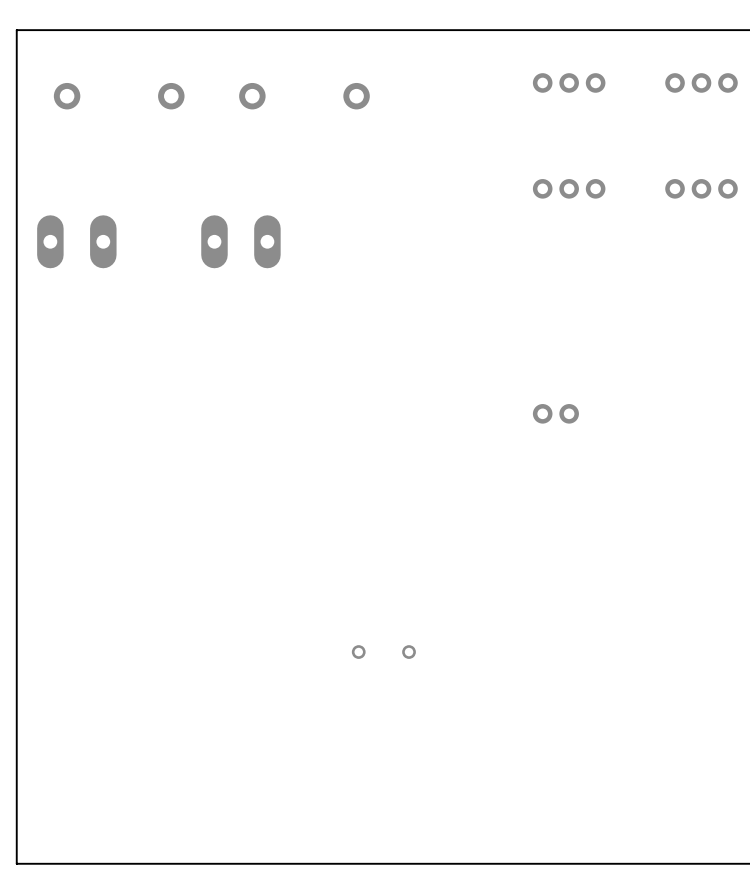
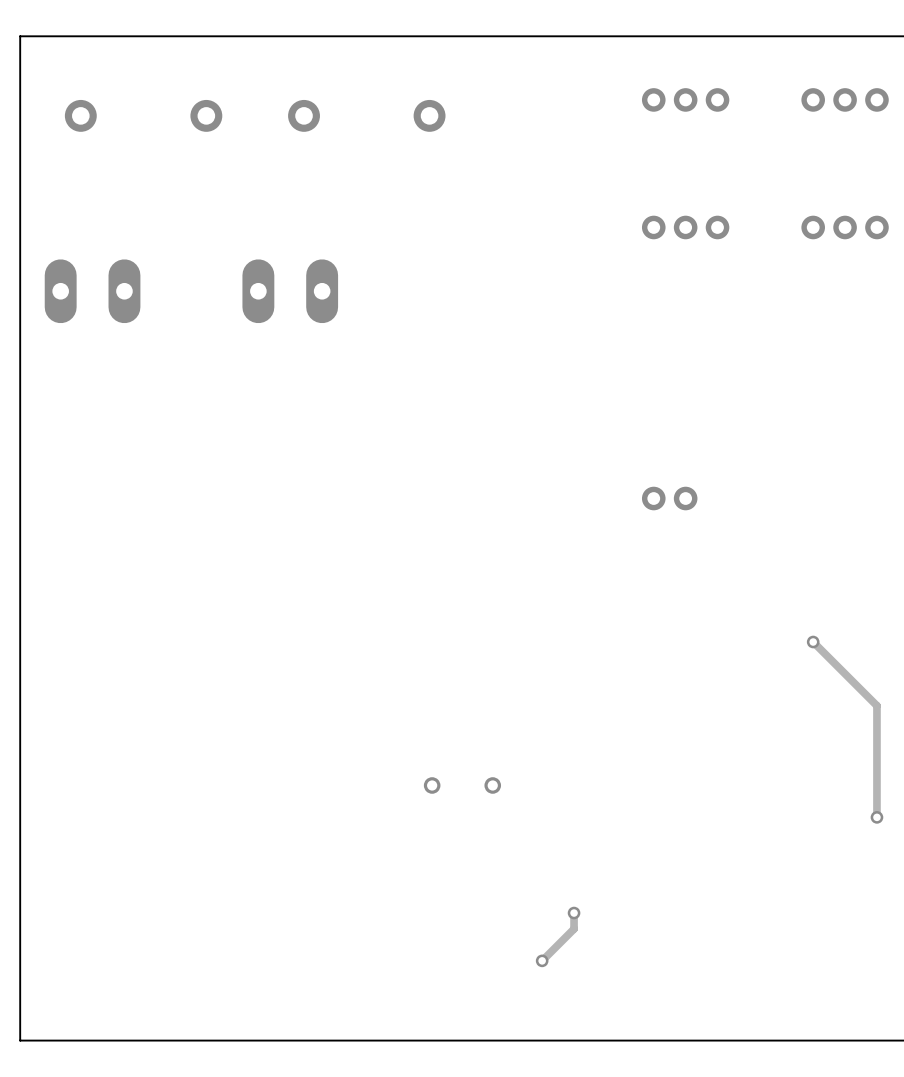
track: none -> (813, 642) (876, 705) (876, 817)
via: none -> (813, 642)
via: none -> (876, 817)
track: none -> (574, 913) (574, 928) (542, 960)
via: none -> (574, 913)
via: none -> (542, 960)

